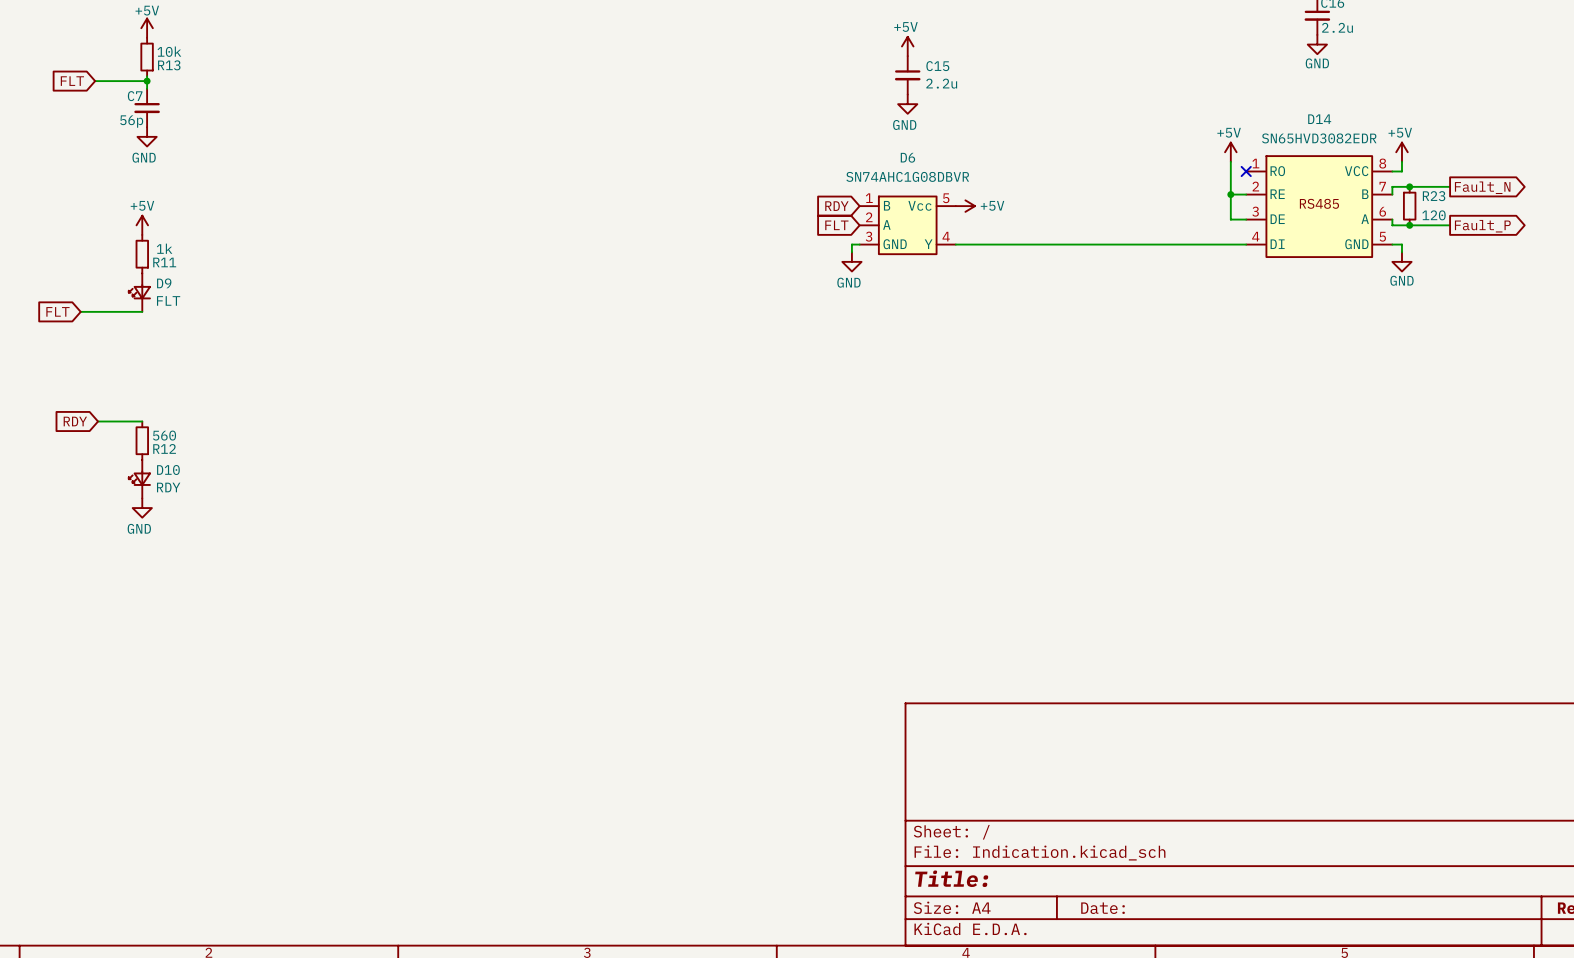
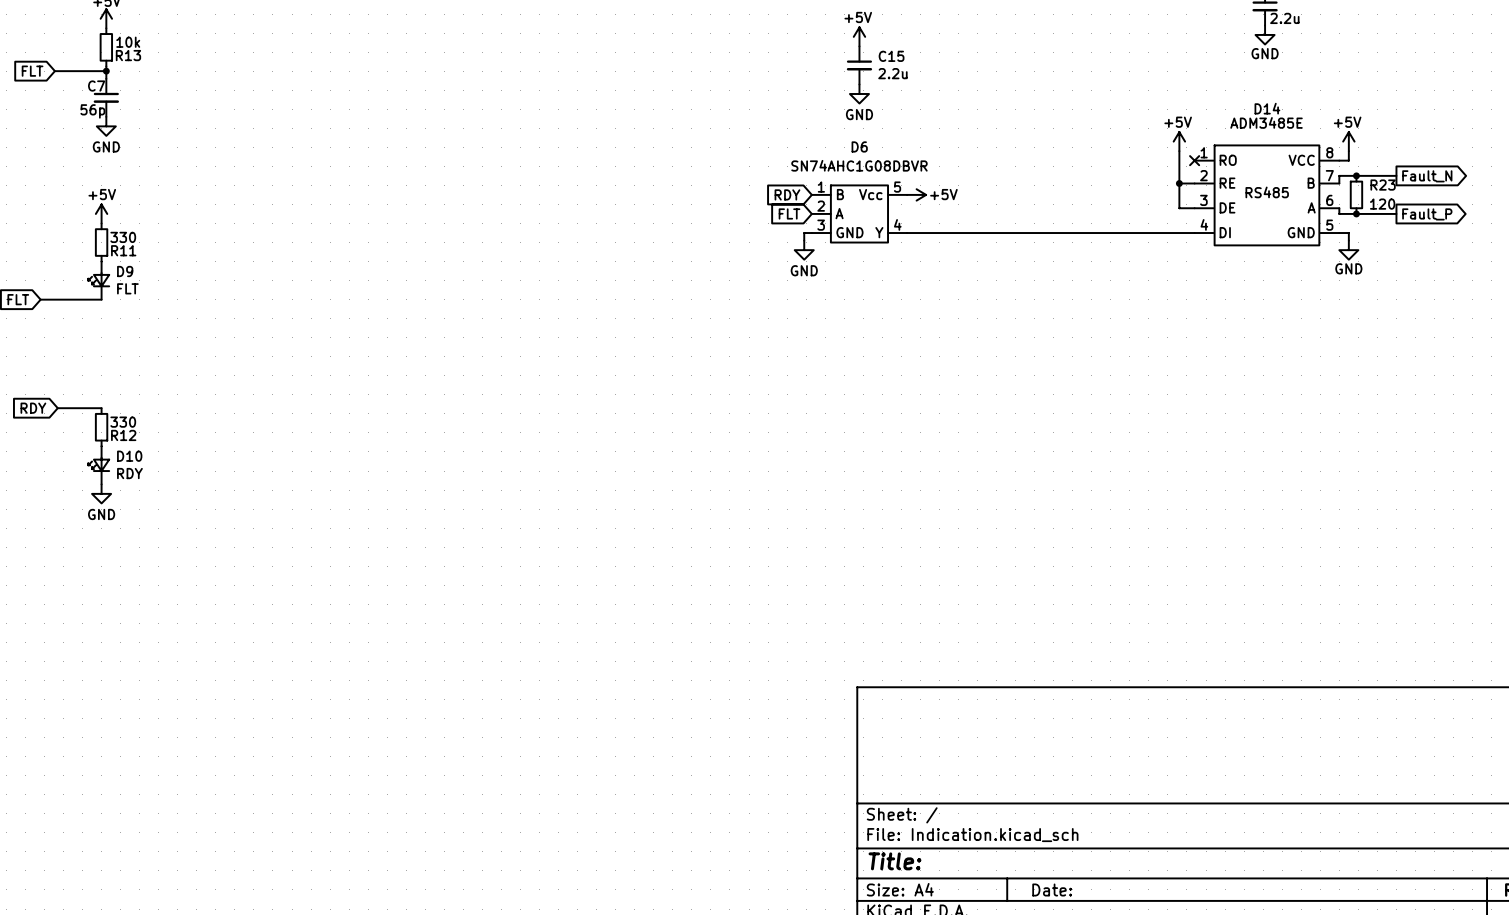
D14 value: SN65HVD3082EDR (1319, 138) -> ADM3485E (1266, 122)
R11 value: 1k (164, 248) -> 330 (123, 237)
R12 value: 560 (164, 435) -> 330 (123, 422)

